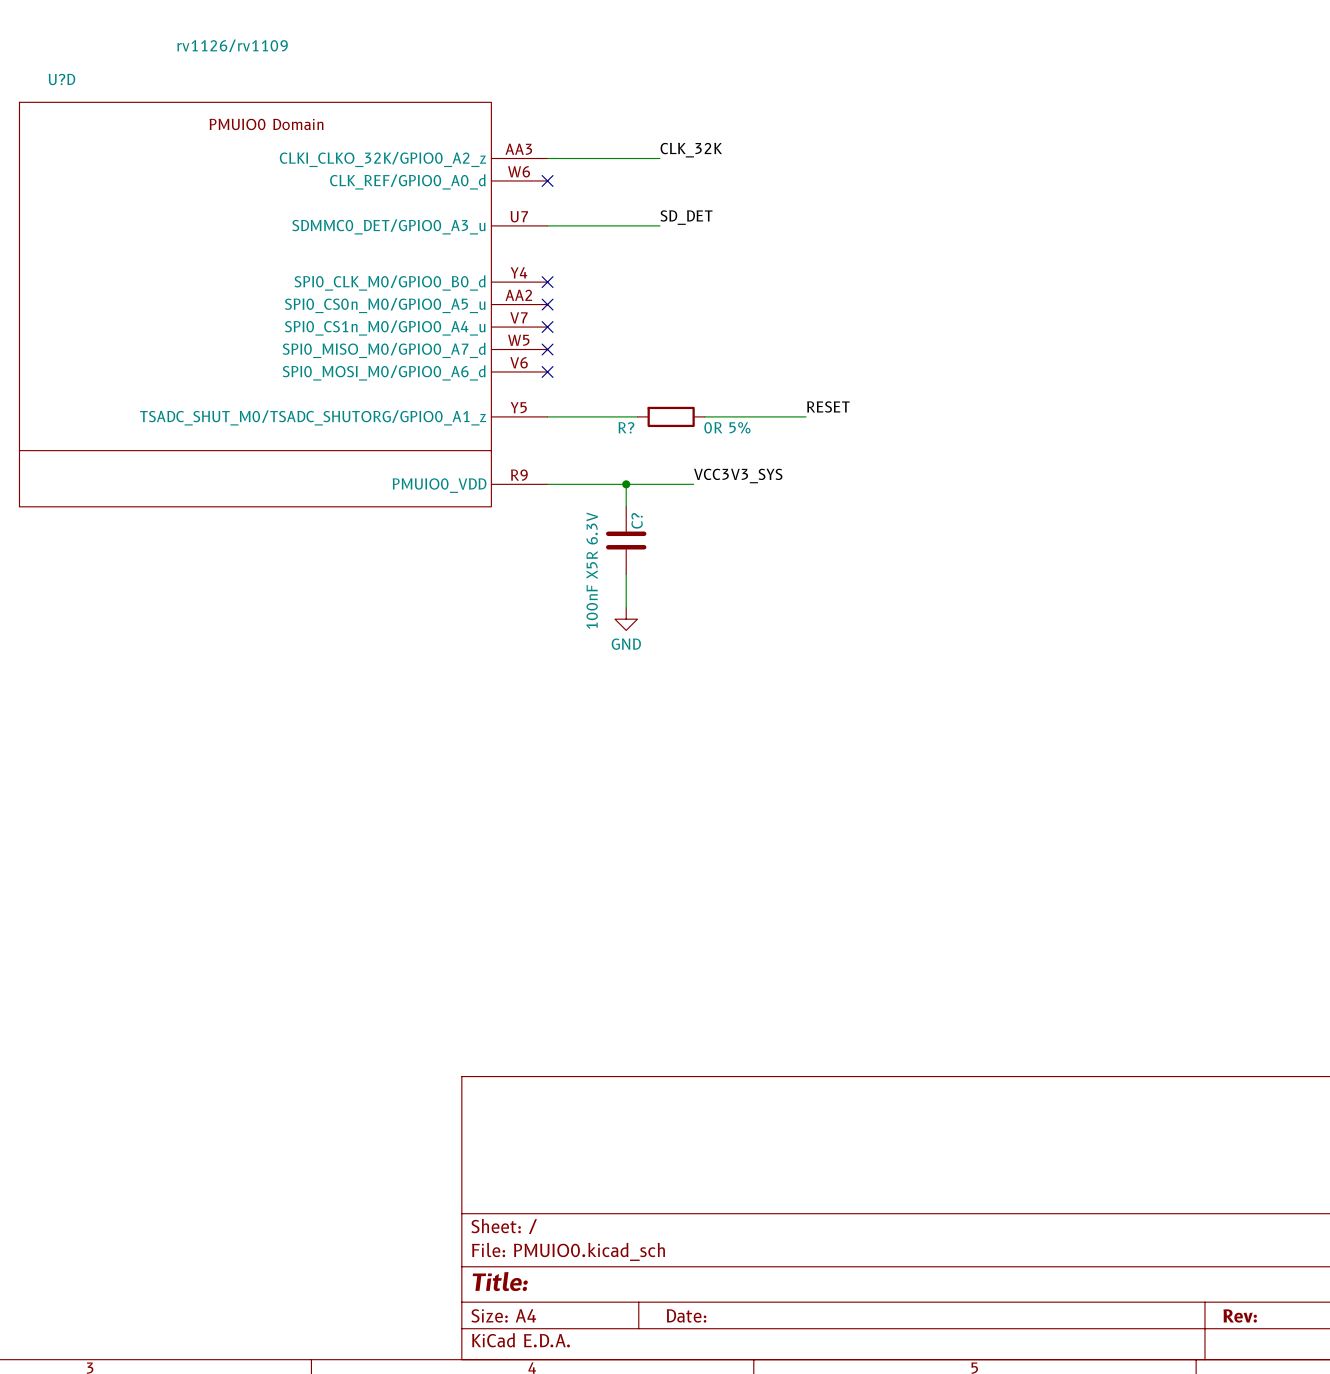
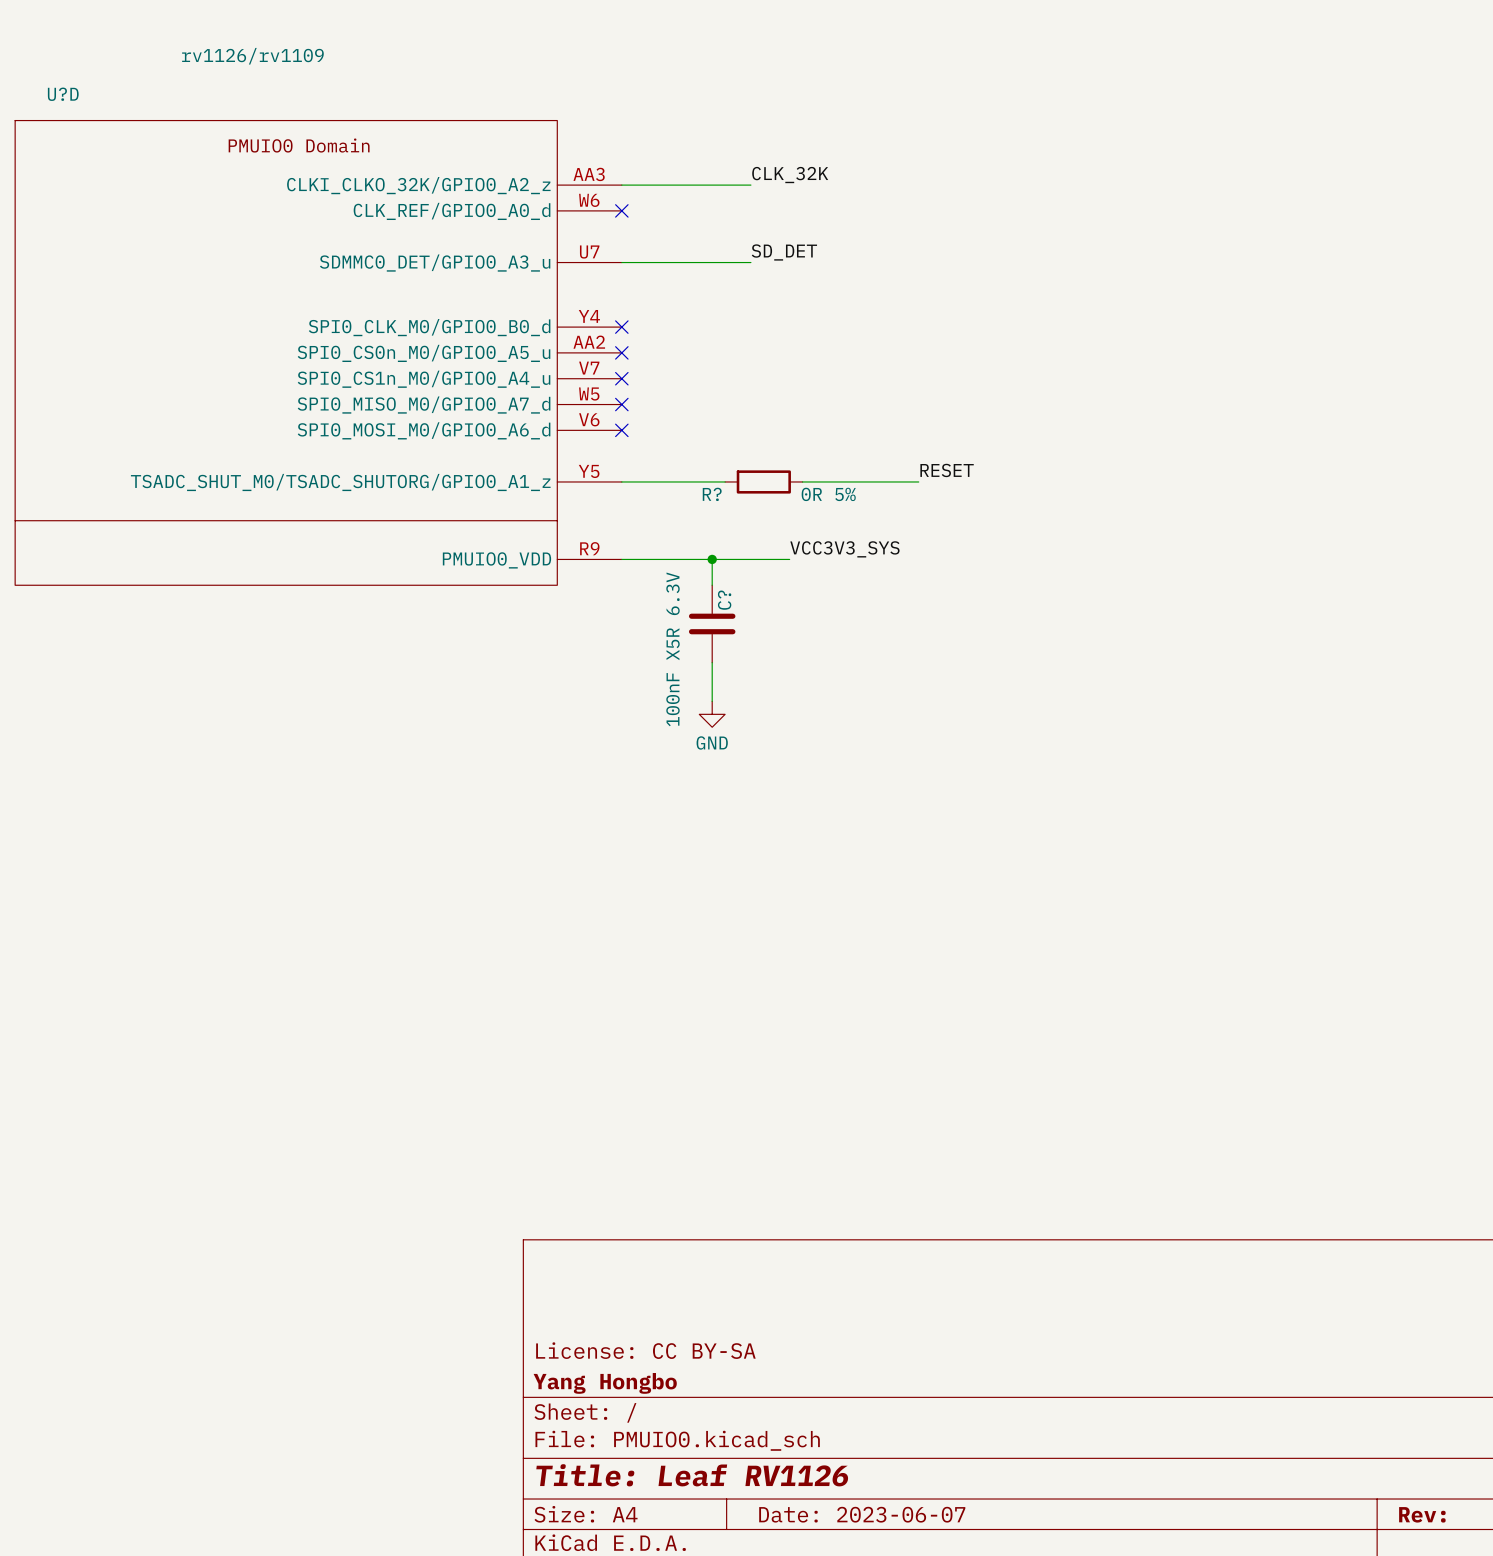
title block: none -> License: CC BY-SA (645, 1350)
title block: none -> Yang Hongbo (605, 1383)
title block: Title: (500, 1281) -> Title: Leaf RV1126 (692, 1475)
title block: Date: (686, 1315) -> Date: 2023-06-07 (862, 1514)

